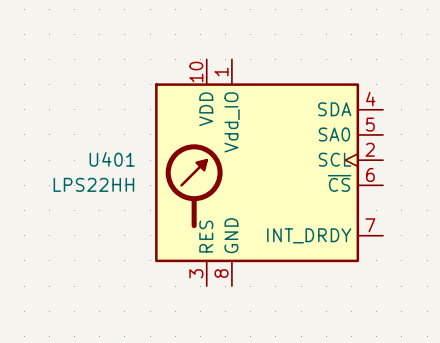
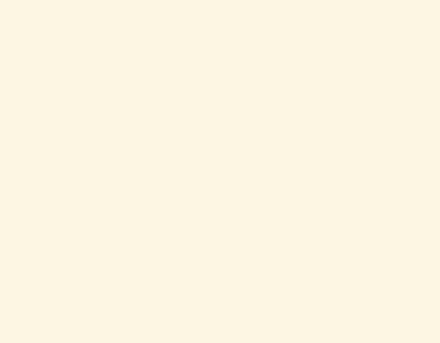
U401: LPS22HH (269, 172) -> none

